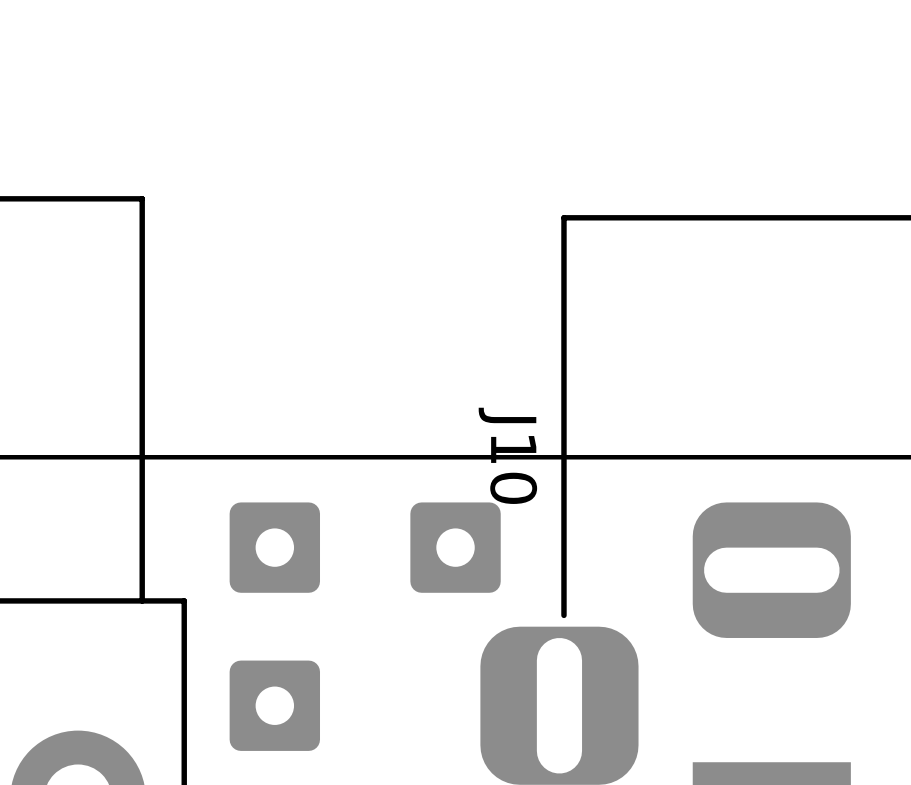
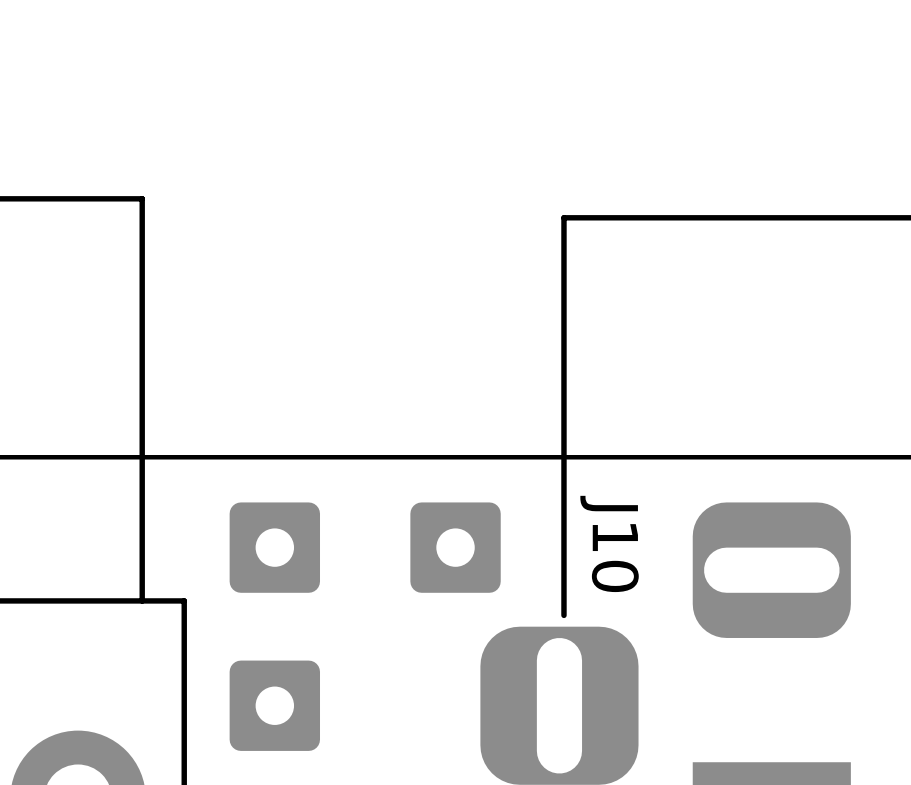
J10 name position: J10 (507, 455) -> J10 (609, 543)

